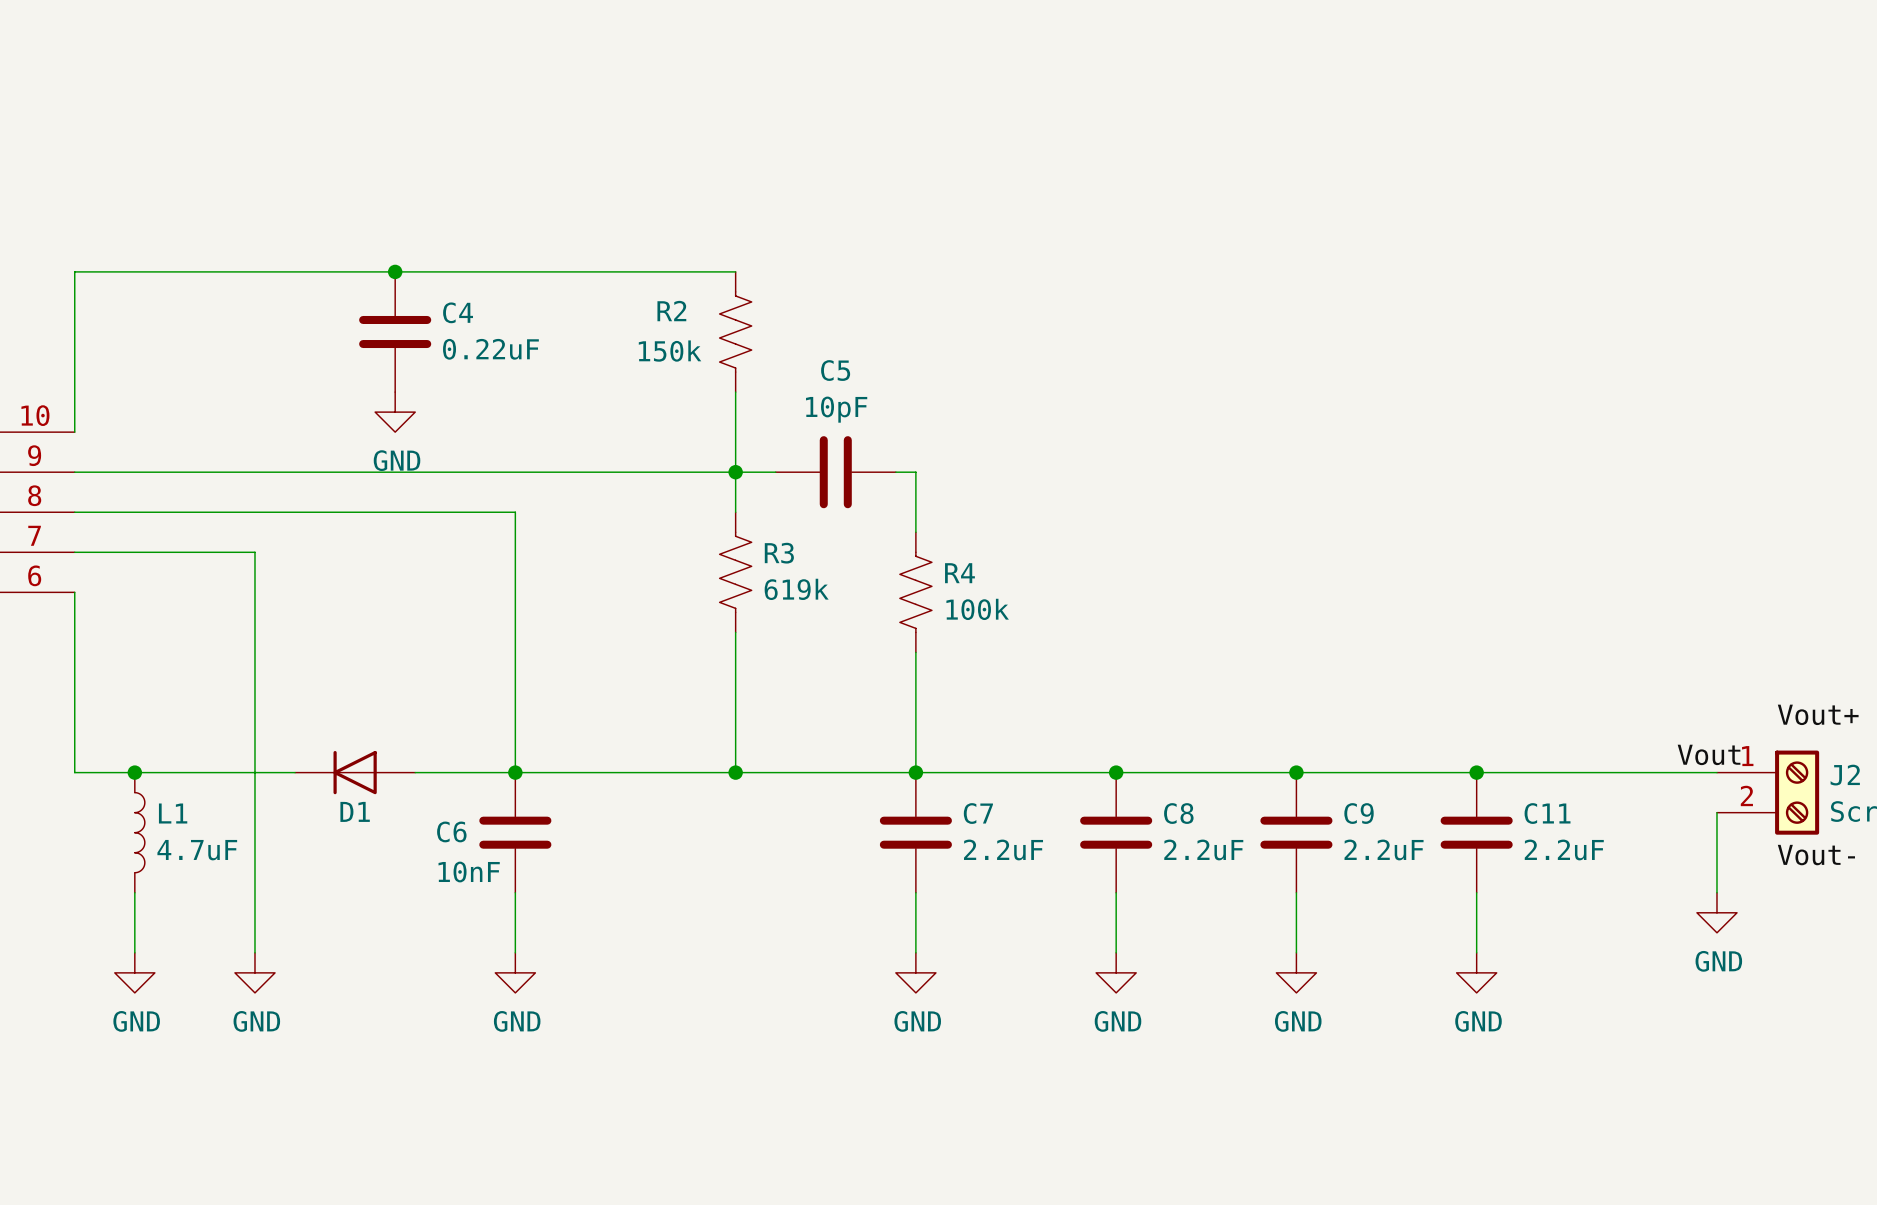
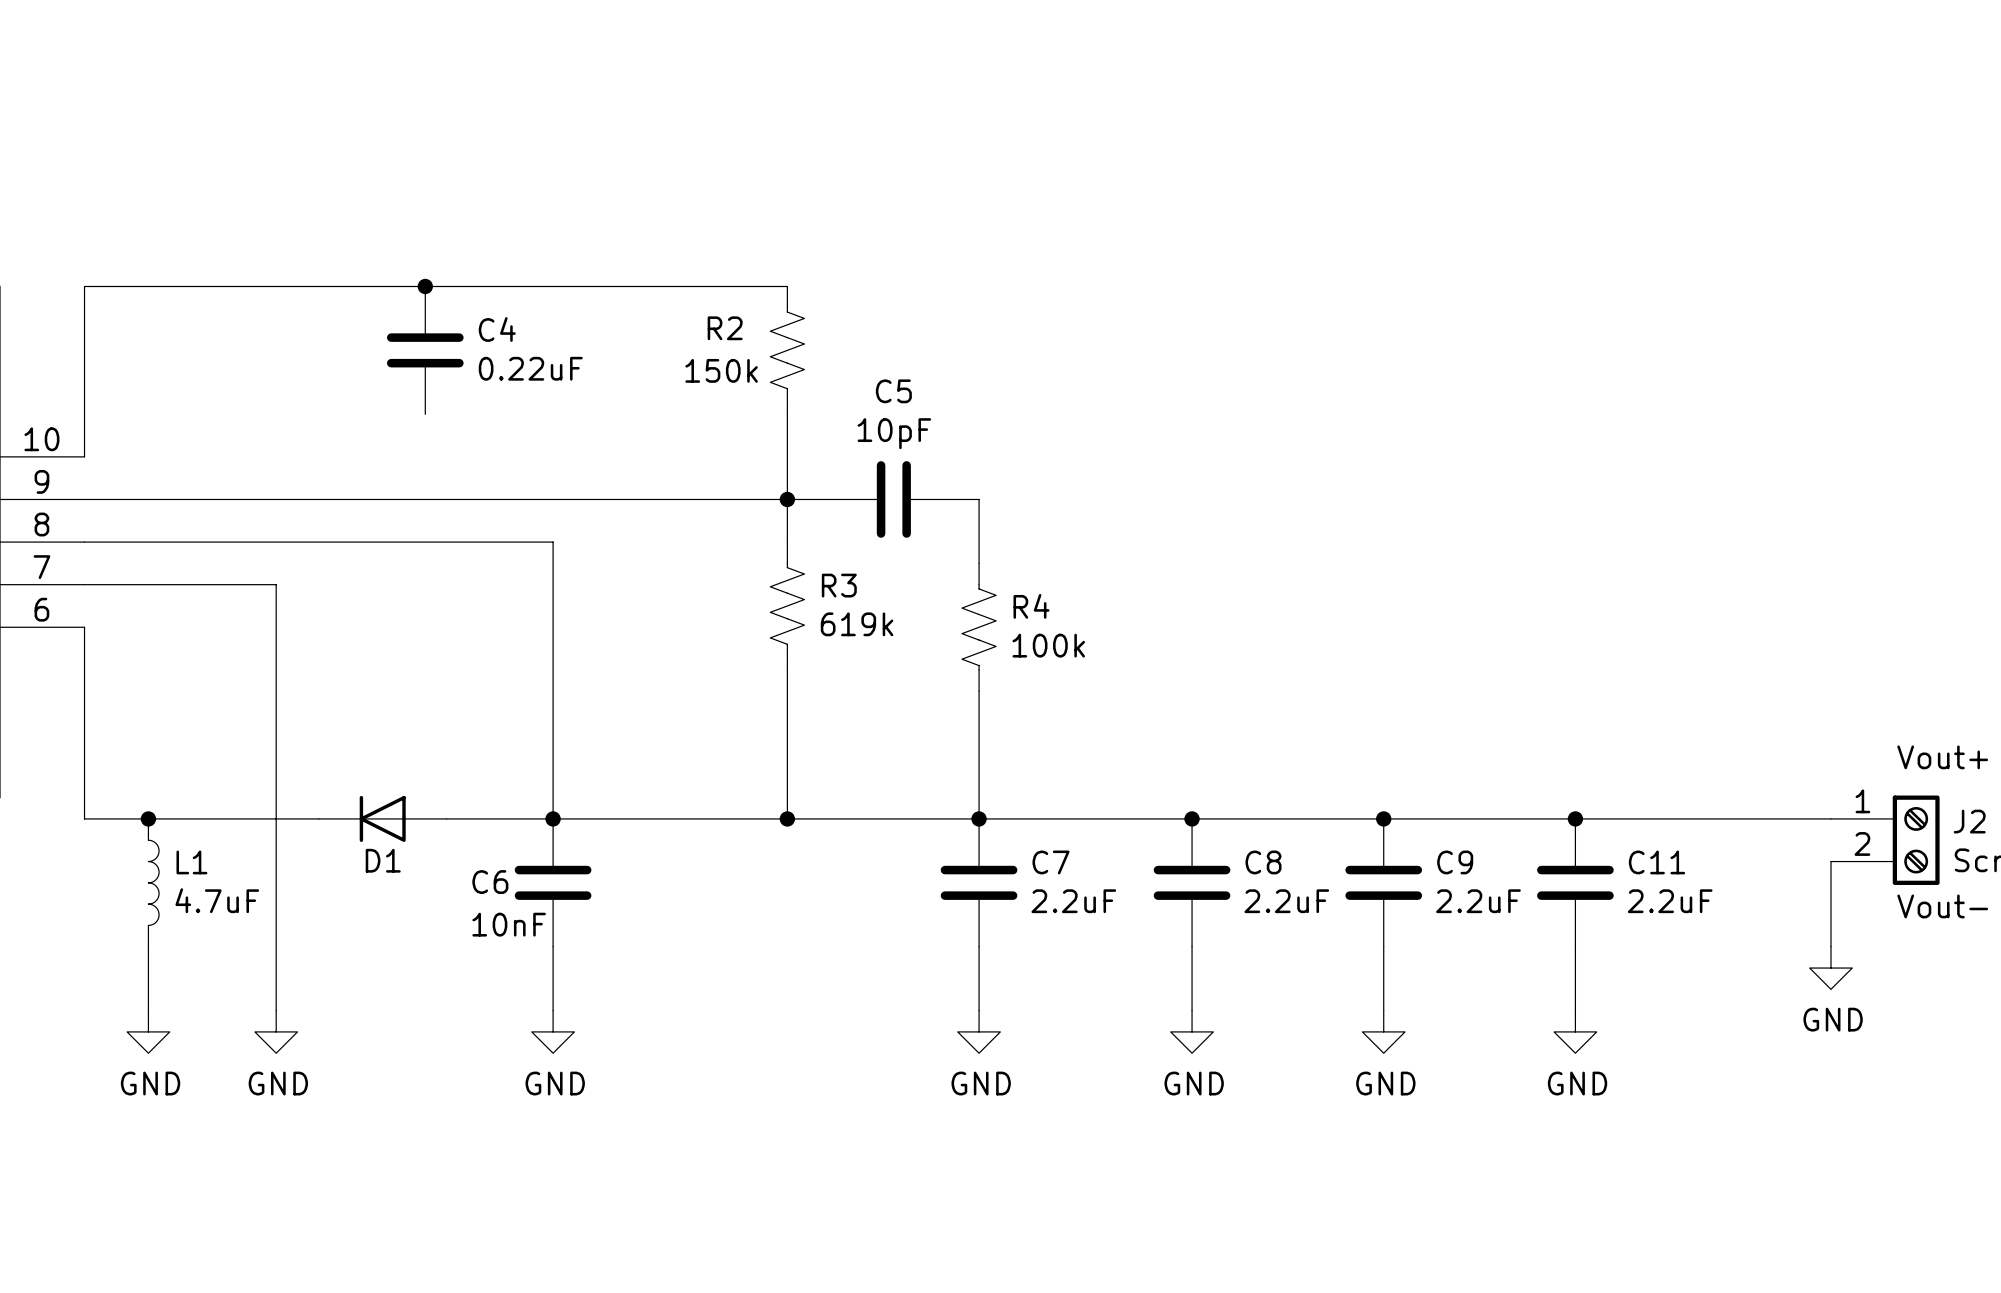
power symbol: GND (395, 412) -> none
label: Vout (1709, 754) -> none

